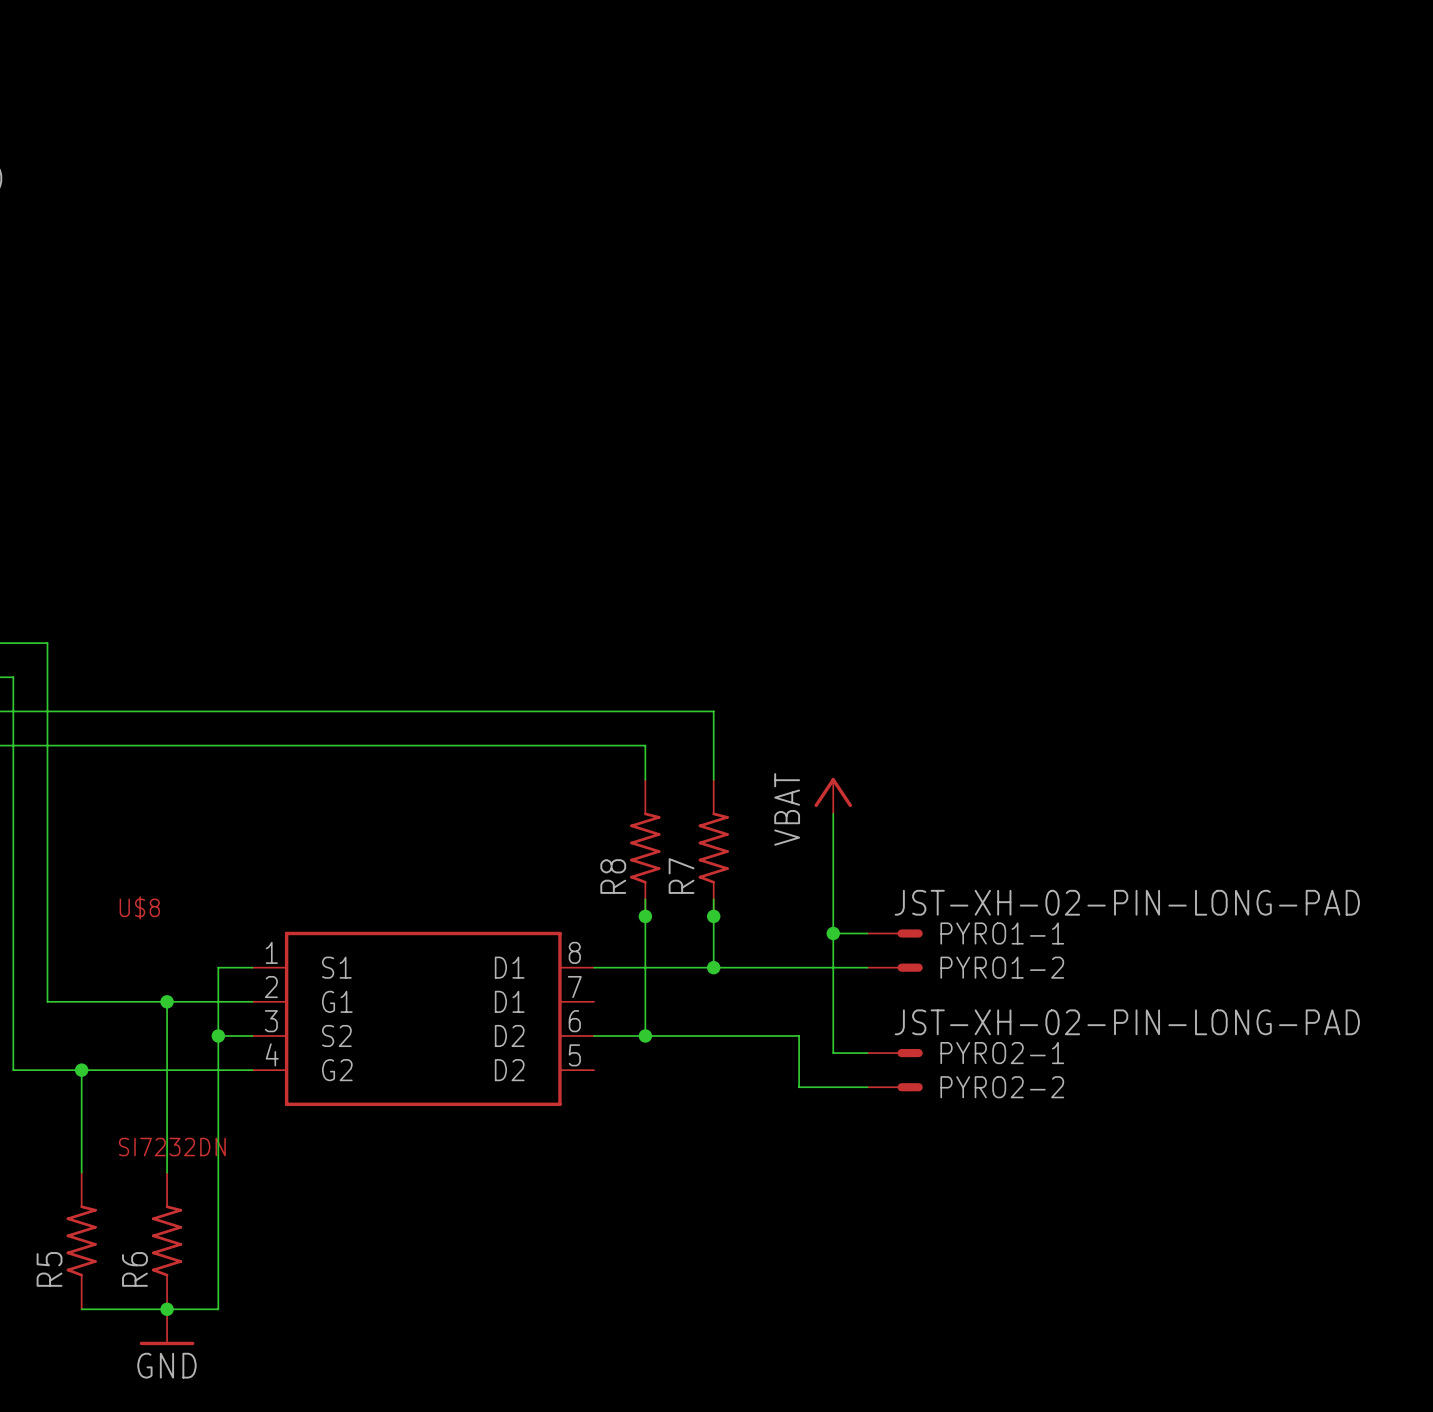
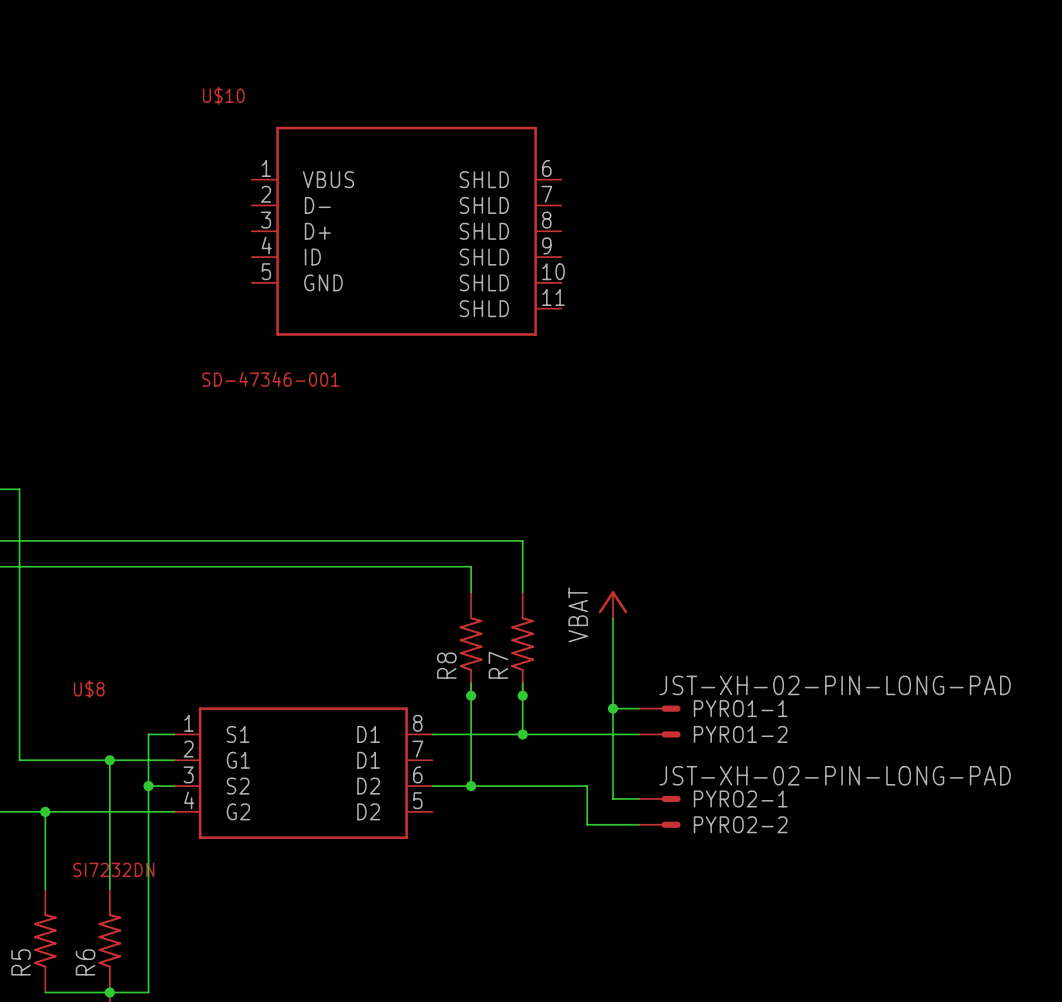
U$10: none -> SD-47346-001 (406, 231)

